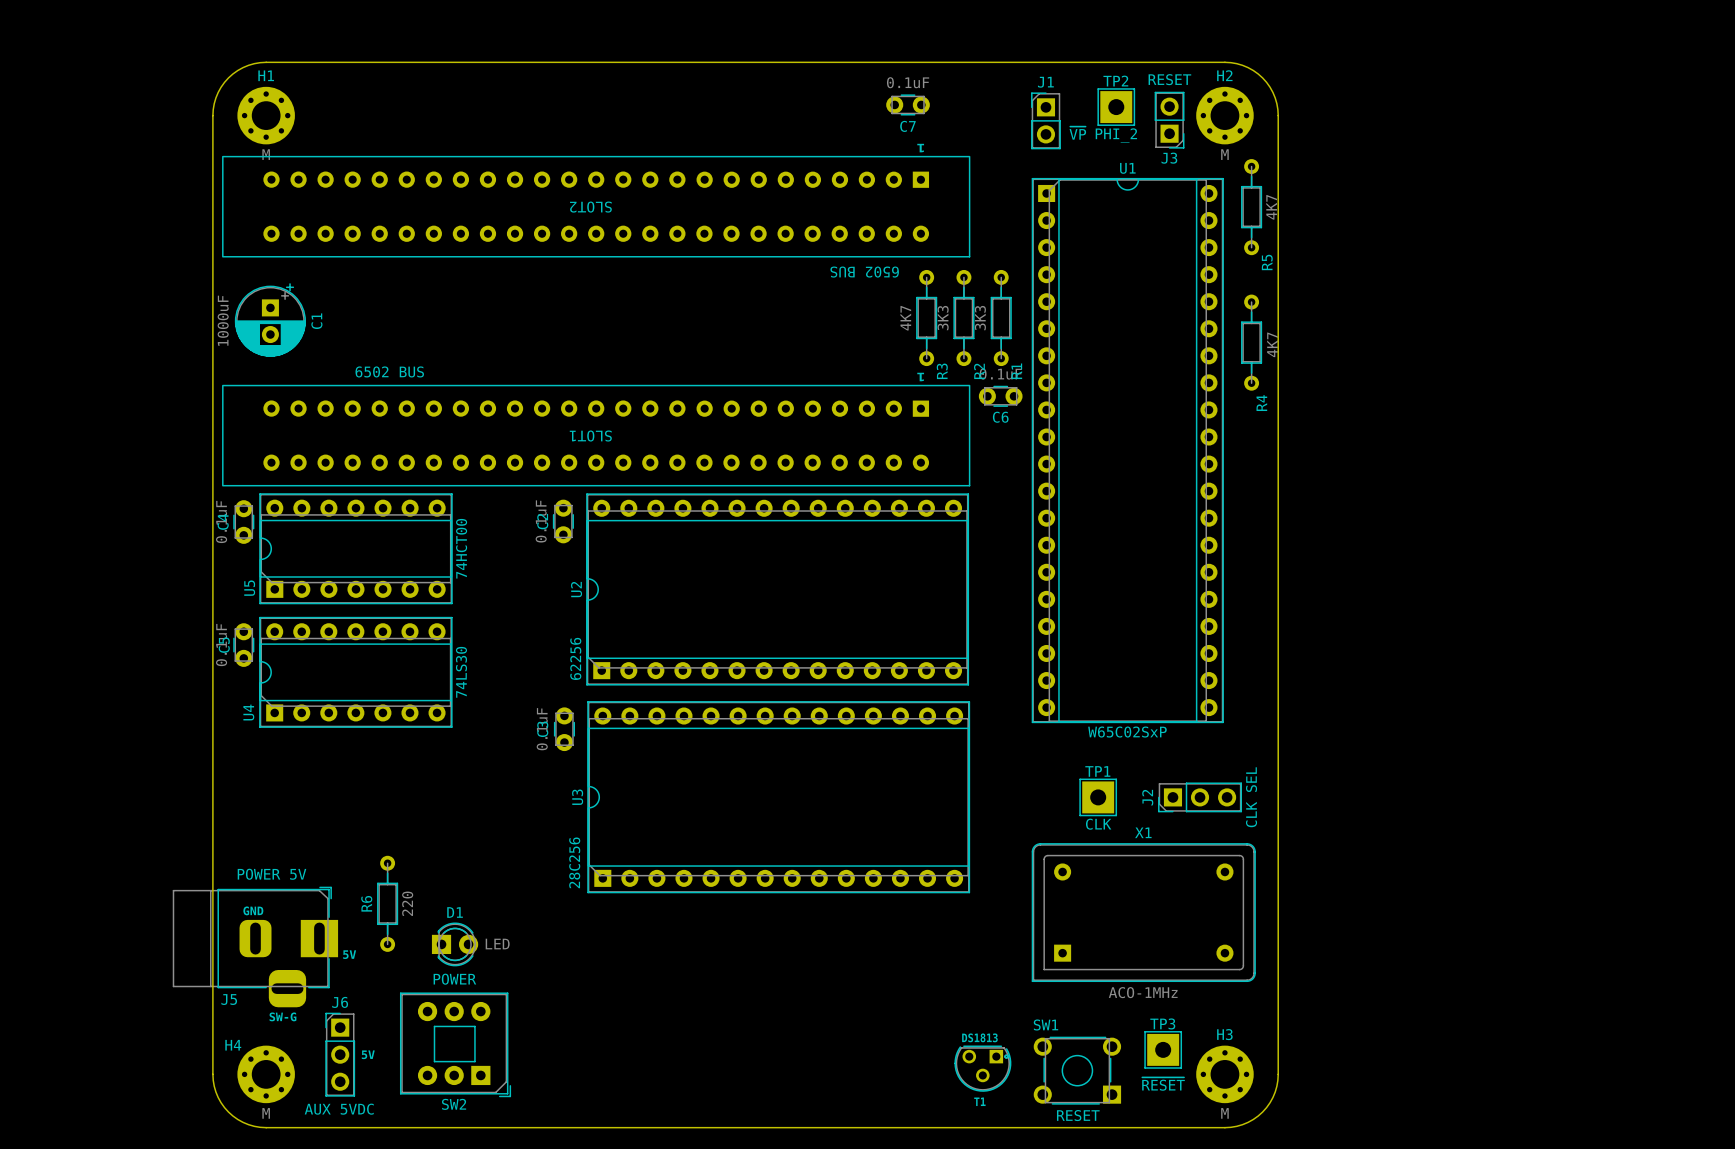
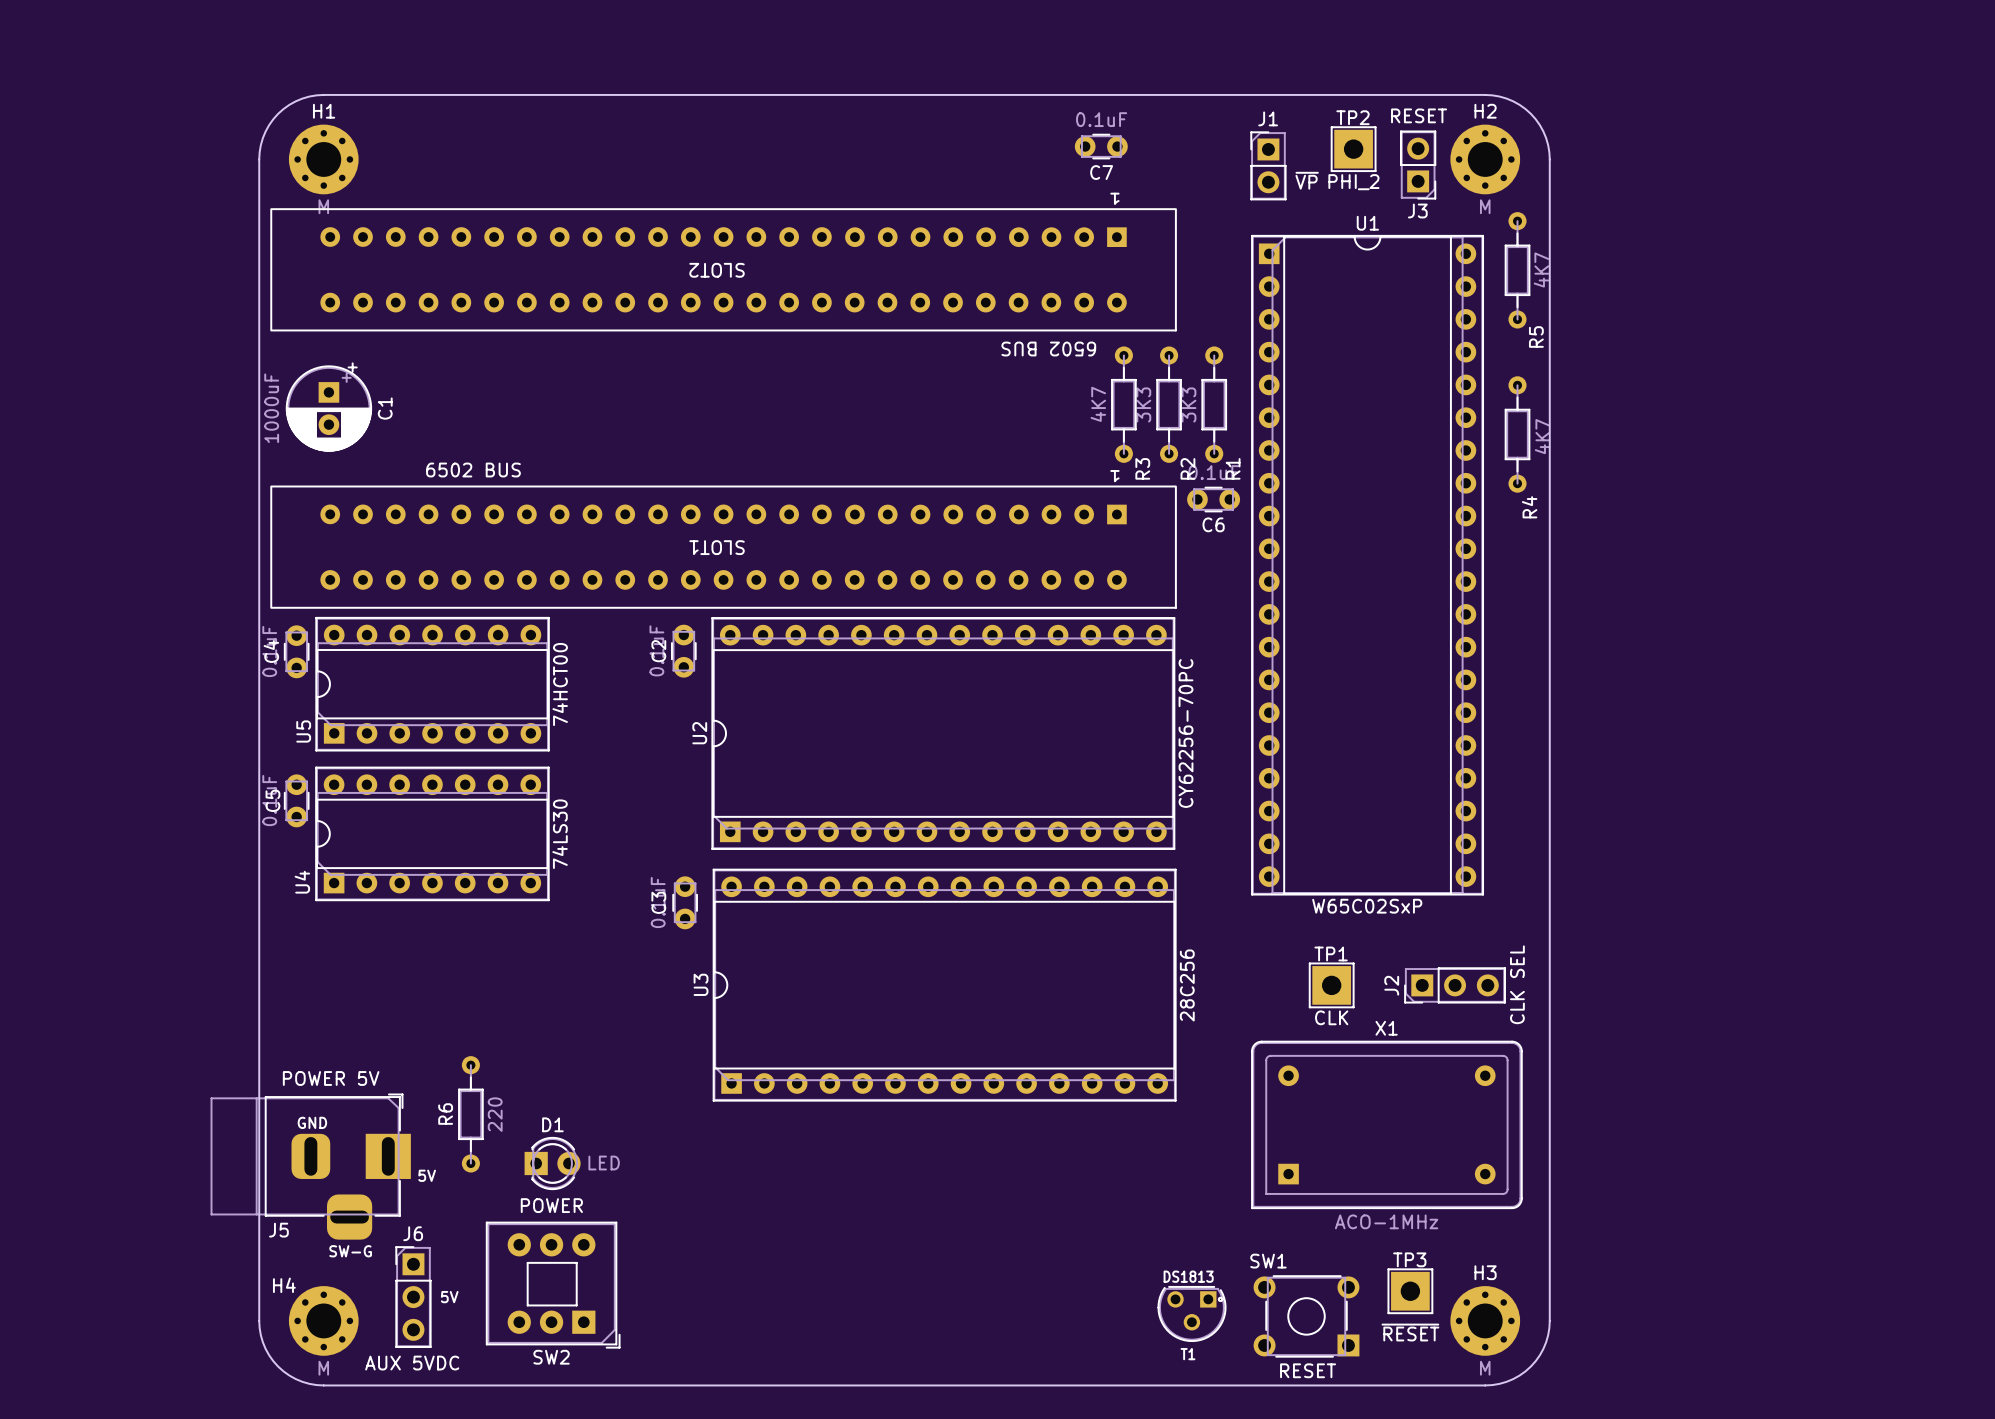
U2 value: 62256 (575, 658) -> CY62256-70PC (1186, 733)
U3 value position: 28C256 (574, 862) -> 28C256 (1187, 985)

